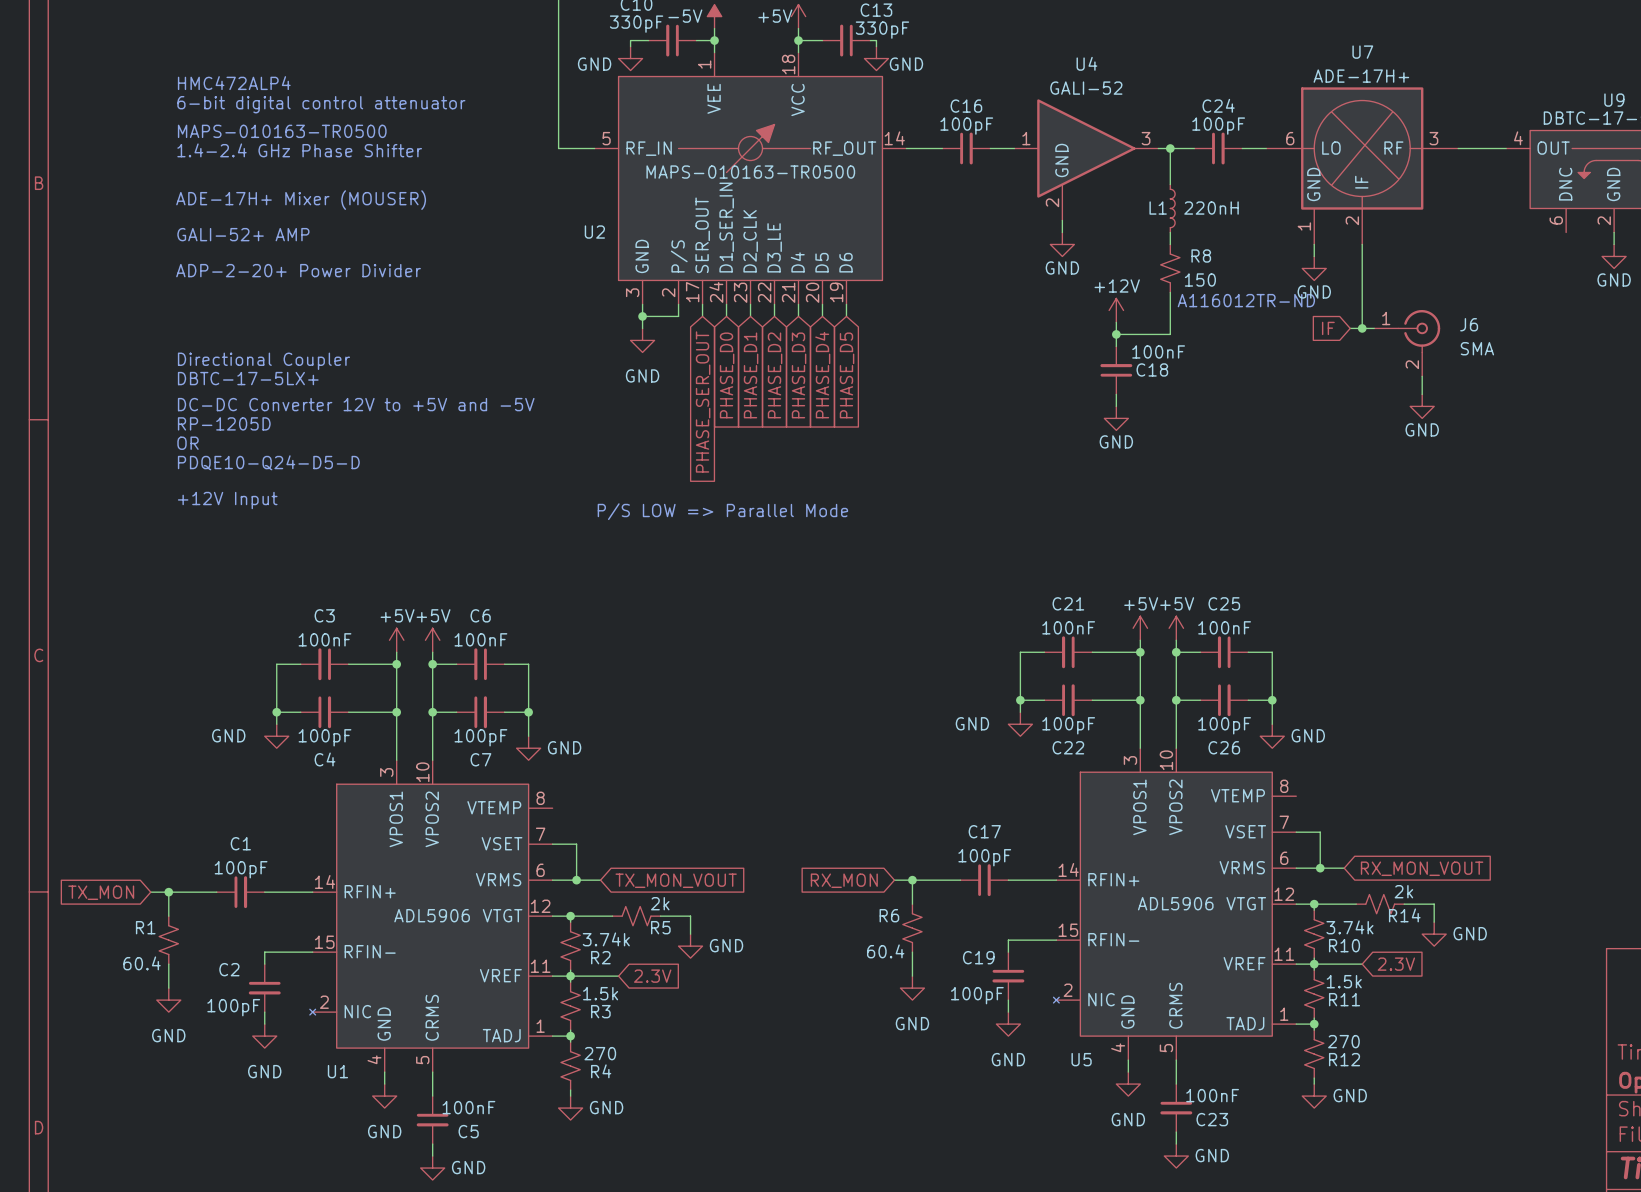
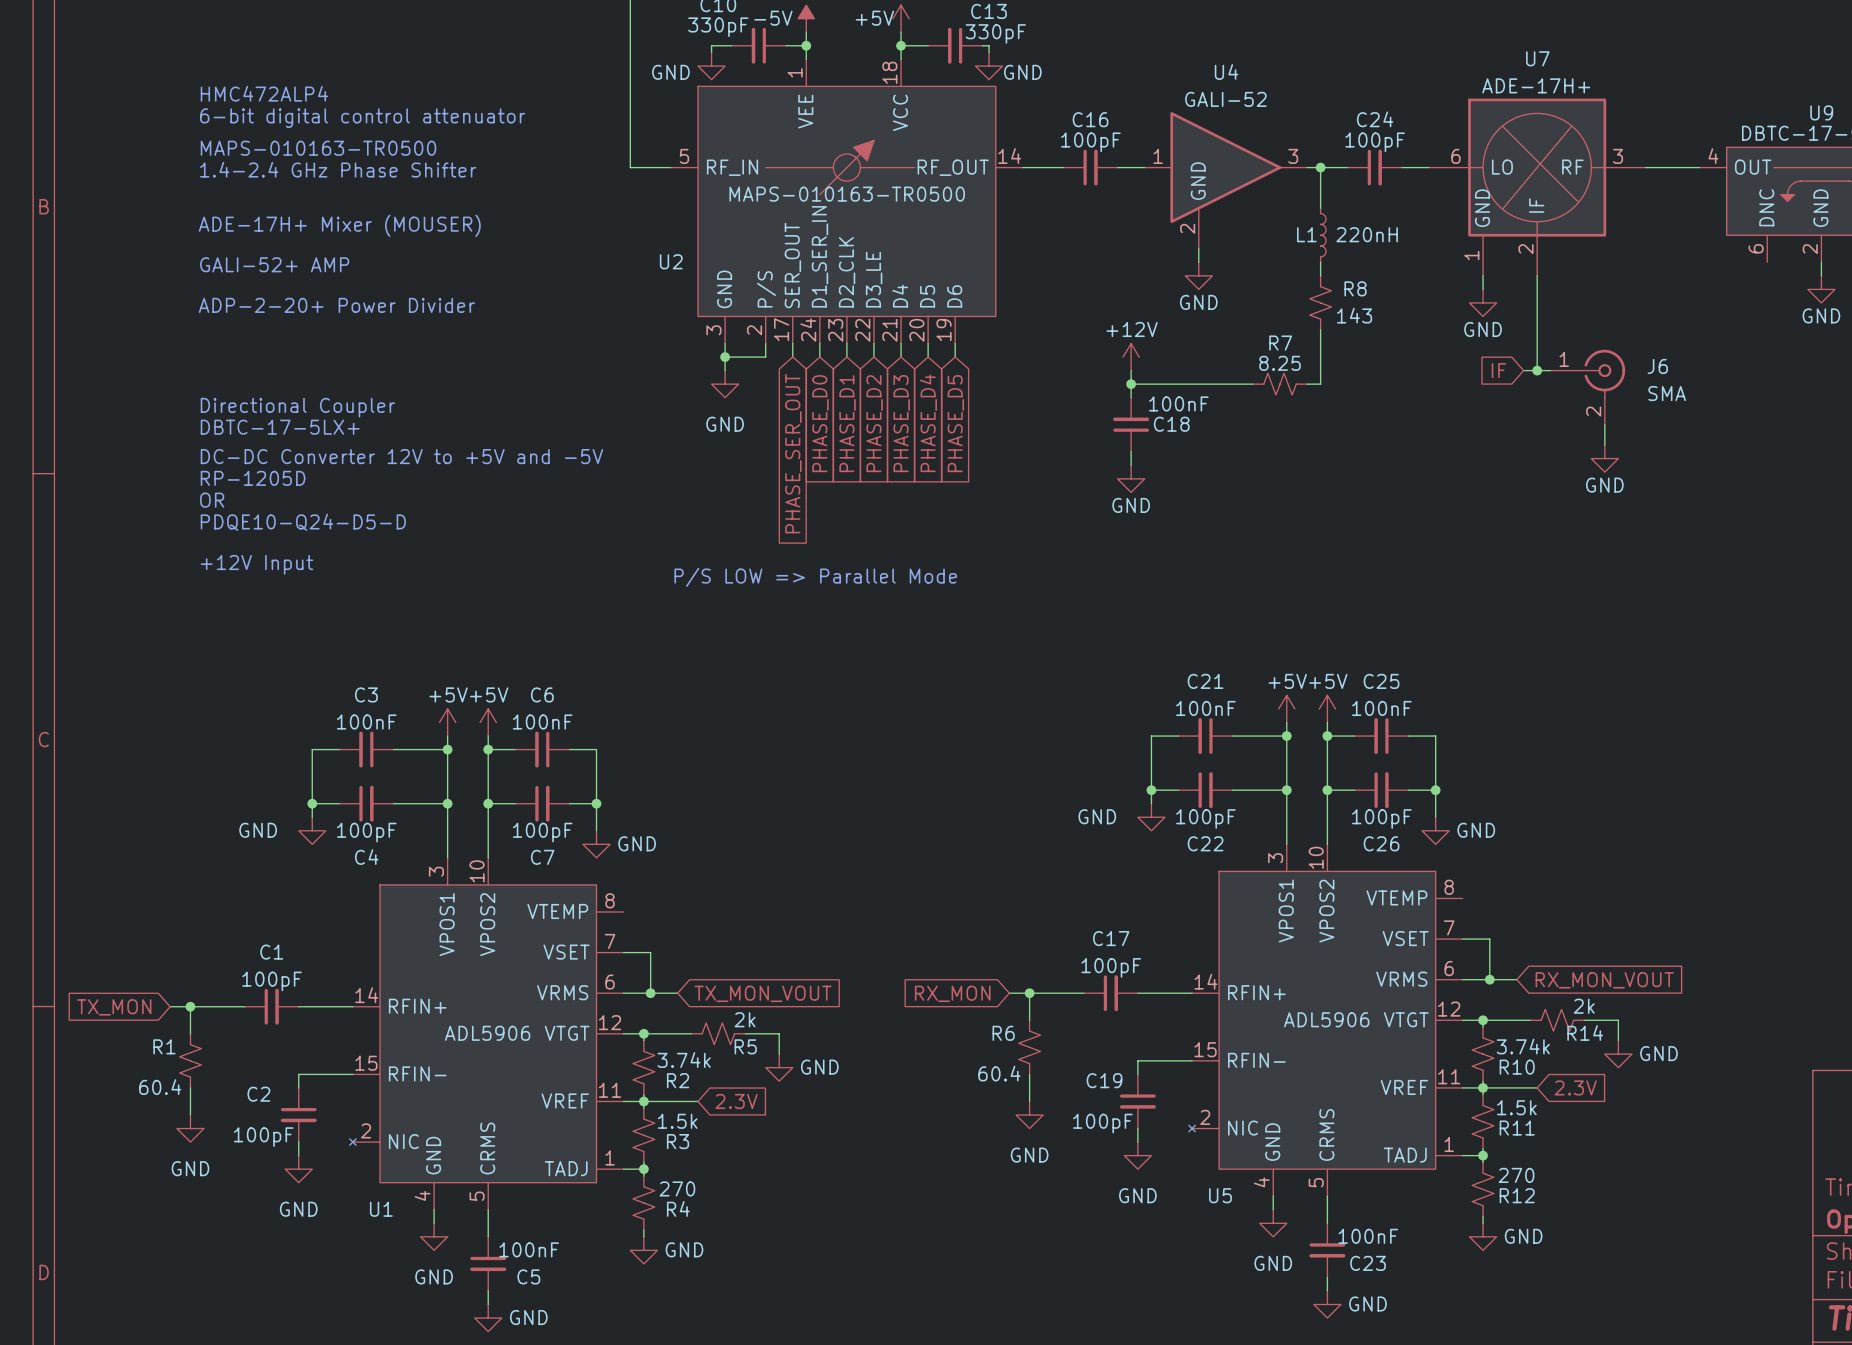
R8 value: 150 (1200, 280) -> 143 (1354, 315)
text: A116012TR-ND (1246, 300) -> none
power symbol position: +12V (1116, 310) -> +12V (1131, 357)
wire: (1116, 322) (1116, 346) -> (1131, 370) (1131, 397)
wire: (1116, 334) (1170, 334) -> (1307, 384) (1320, 384) (1320, 377)
junction: (1116, 334) -> none
wire: none -> (1131, 384) (1252, 384)
junction: none -> (1131, 384)
R7: none -> 8.25 (1280, 384)
C18 position: (1116, 370) -> (1131, 424)
wire: (1116, 394) (1116, 406) -> (1131, 451) (1131, 465)
power symbol position: GND (1116, 418) -> GND (1131, 478)

